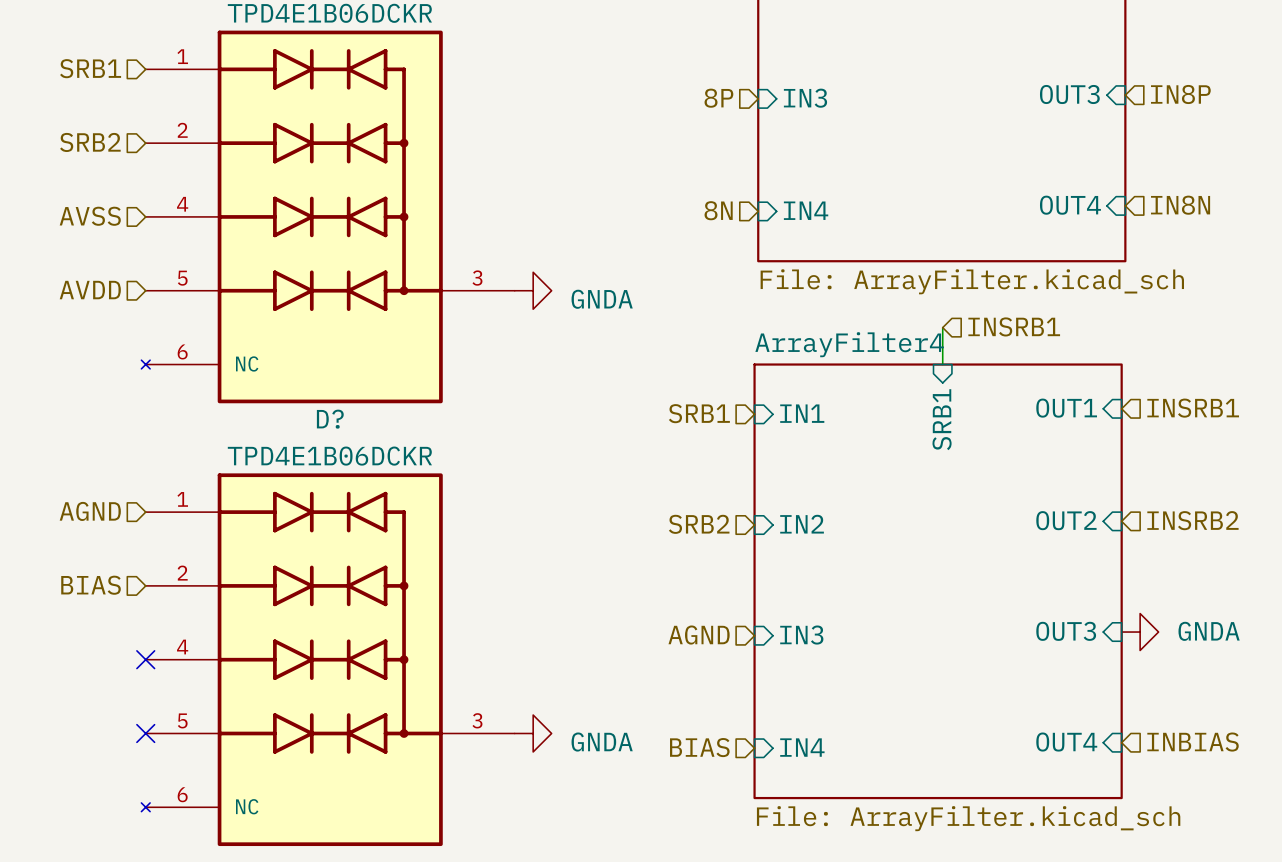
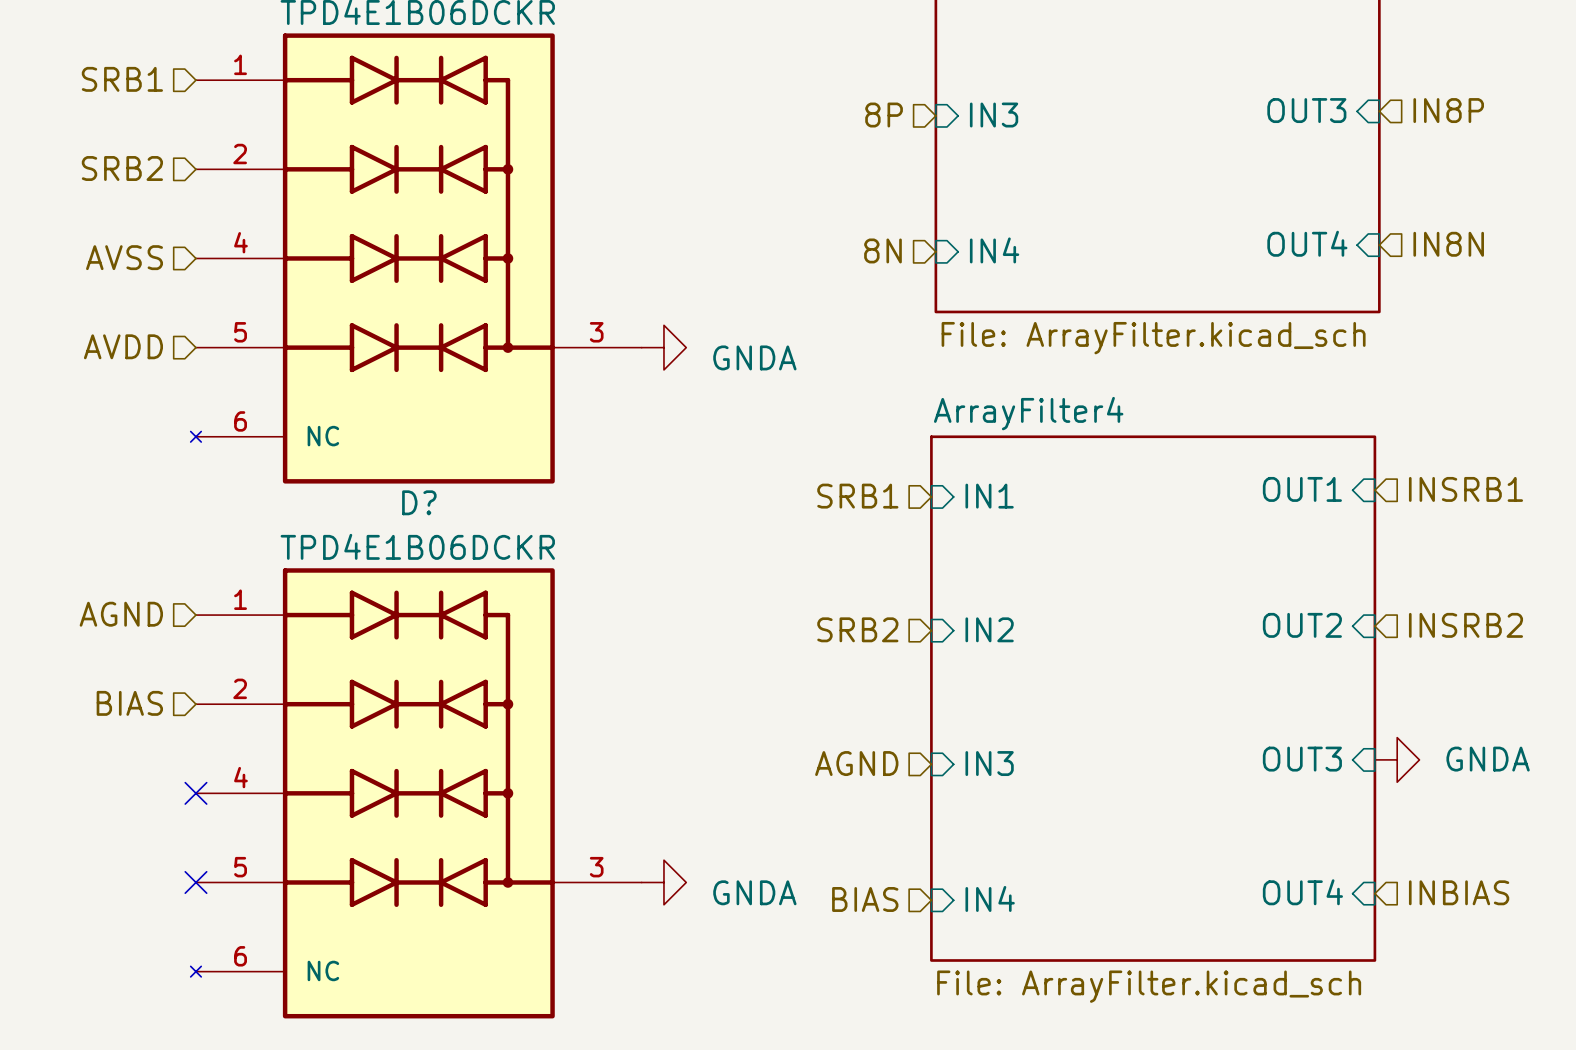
hierarchical label: INSRB1 (1014, 326) -> none
wire: (942, 327) (942, 364) -> none
sheet pin: SRB1 (942, 419) -> none

